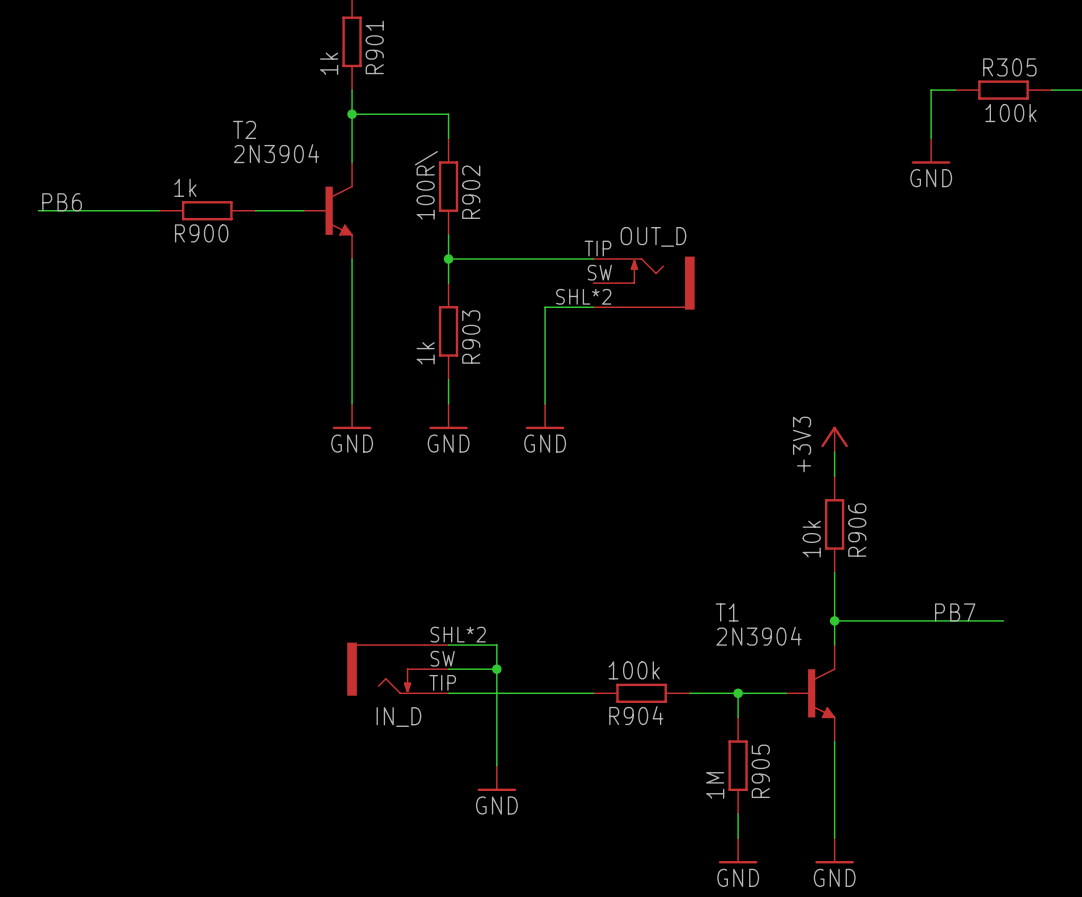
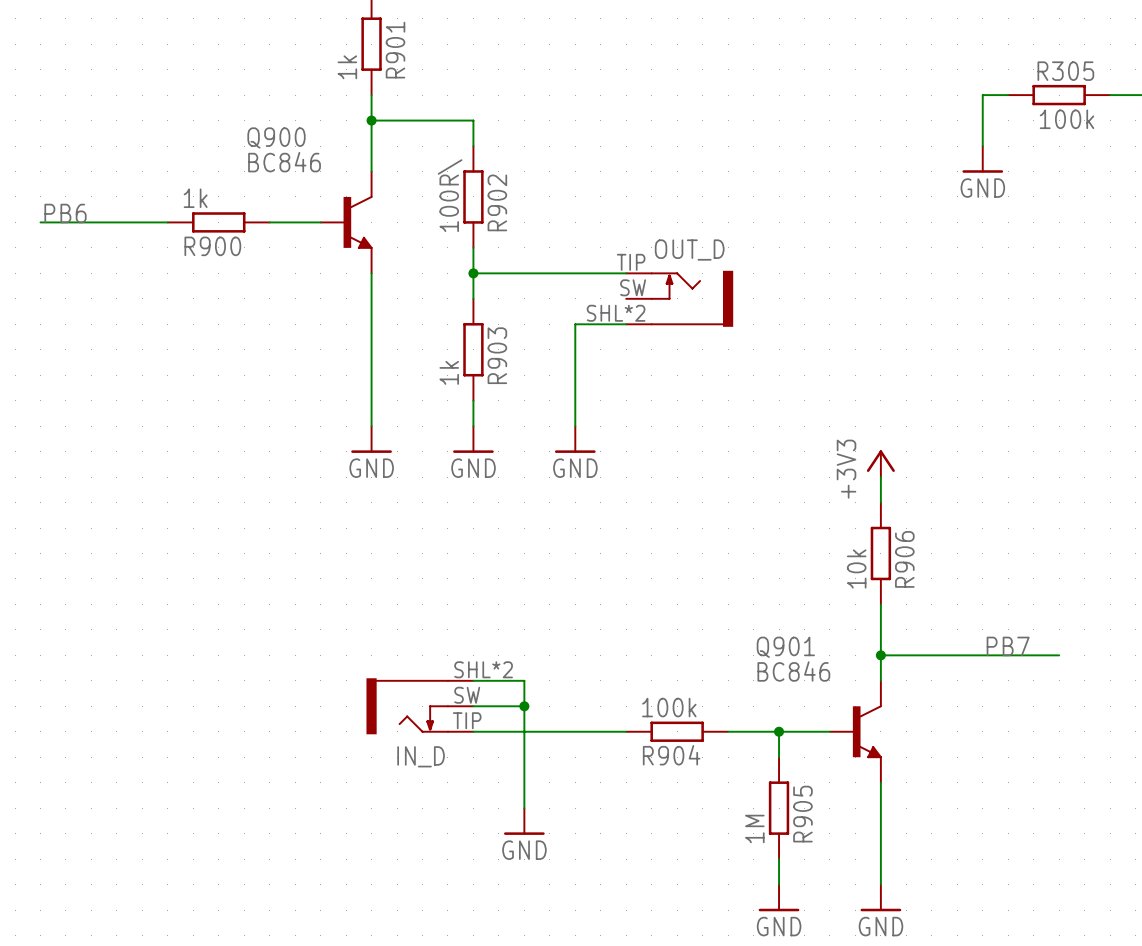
T2 name: T2 (244, 129) -> Q900 (276, 137)
T2 value: 2N3904 (276, 153) -> BC846 (284, 162)
T1 name: T1 (727, 612) -> Q901 (785, 647)
T1 value: 2N3904 (759, 636) -> BC846 (793, 671)

